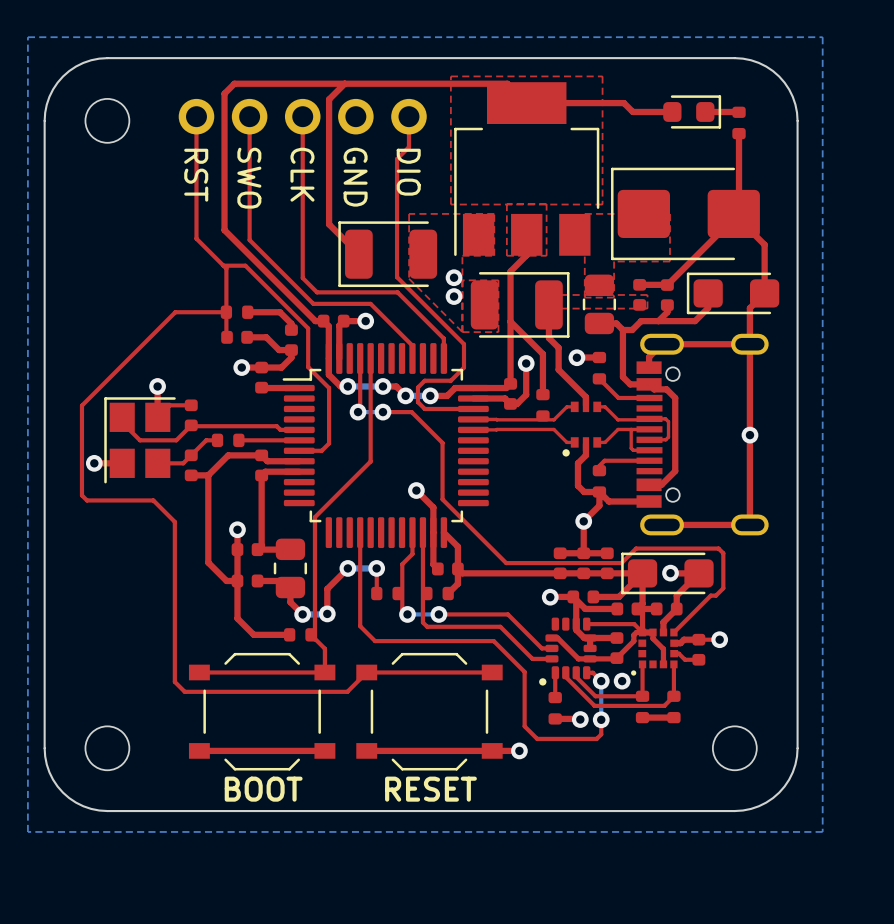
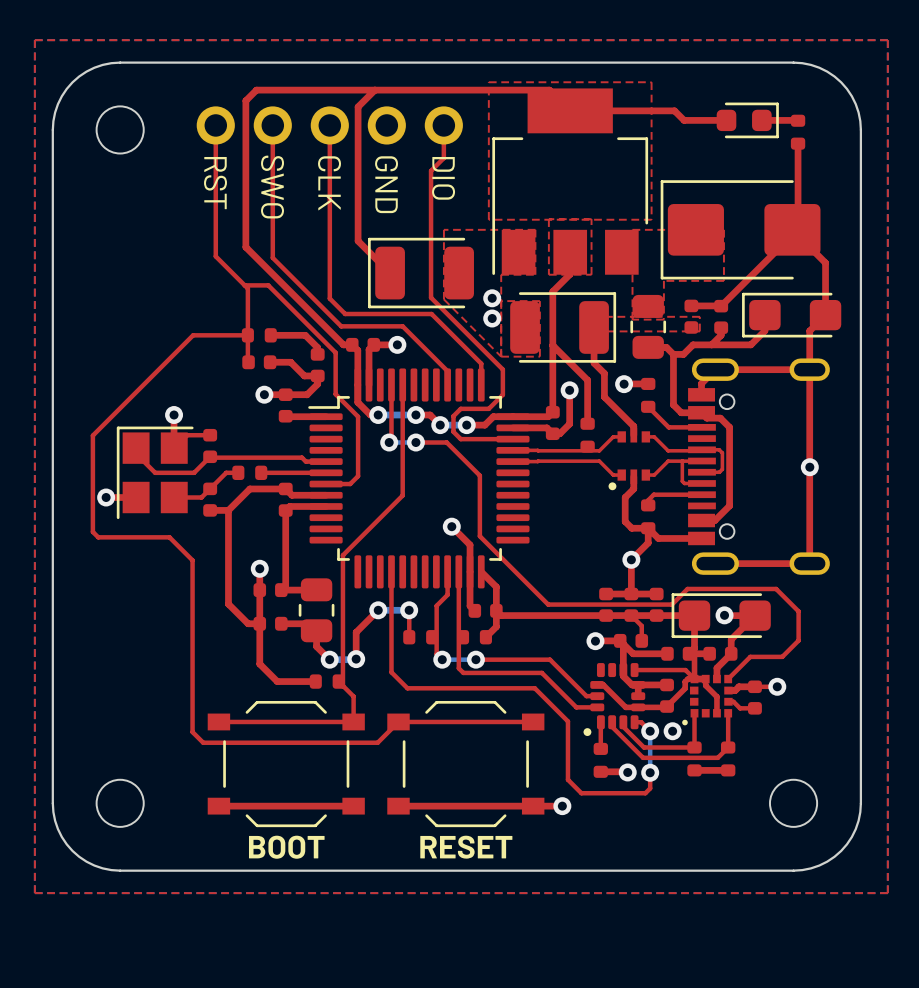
top zone outline: none -> (34, 40) (887, 40) (887, 893) (34, 893) (34, 40)
top track: (723, 553) (723, 588) (716, 595) (710, 595) (694, 611) -> (781, 594) (798, 611) (798, 640) (782, 656) (750, 656)
top track: (642, 573) (619, 596) (593, 596) -> (631, 615) (641, 625) (641, 640)

